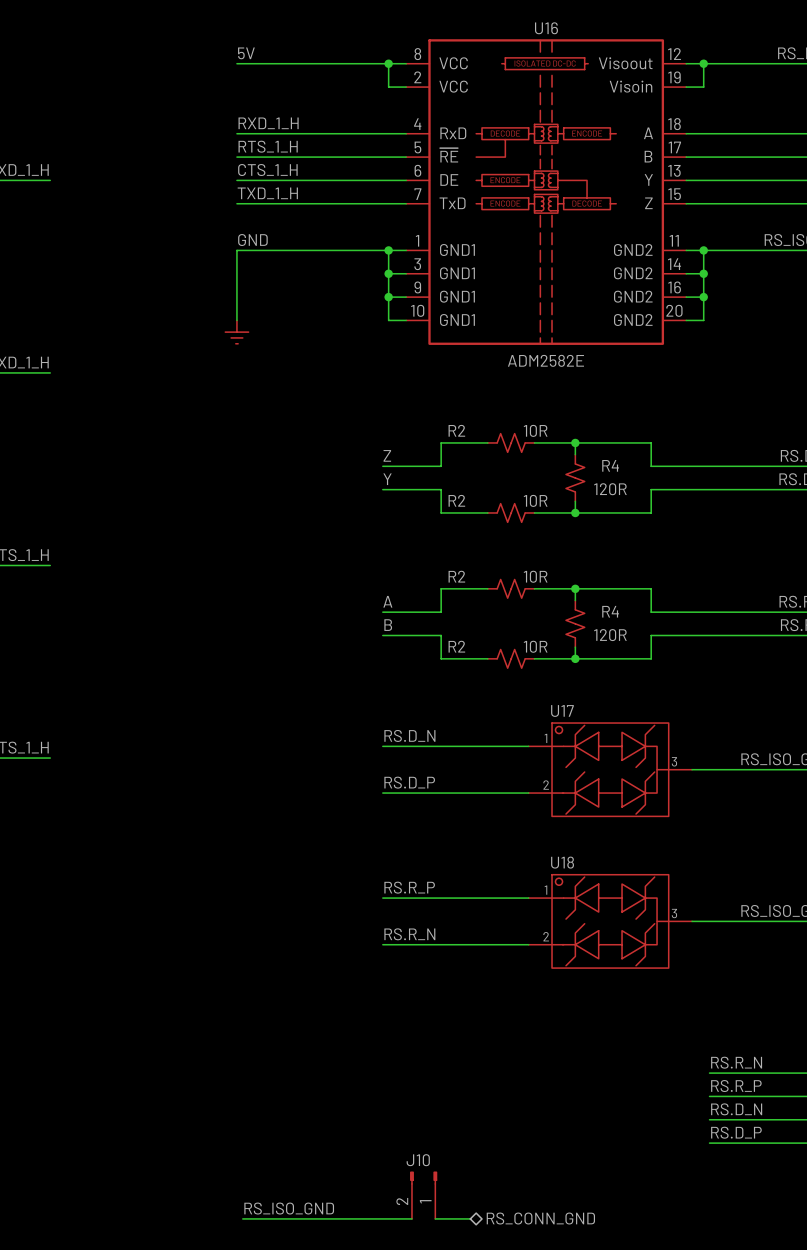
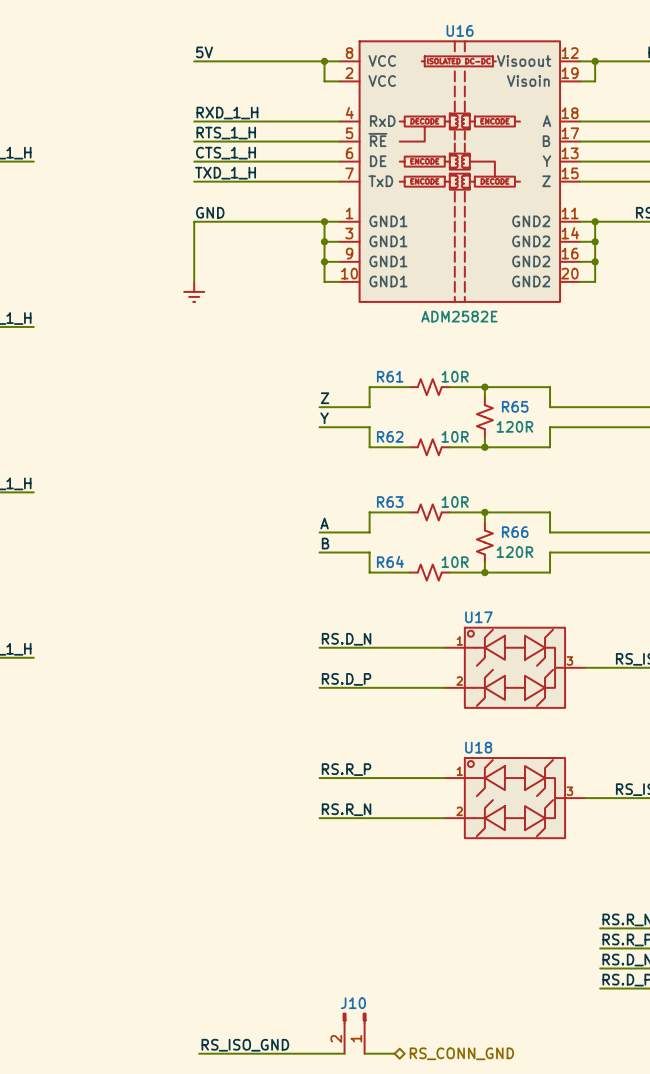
R2 name: R2 (456, 430) -> R61 (390, 376)
R4 name: R4 (610, 465) -> R65 (515, 406)
R2 name: R2 (456, 500) -> R62 (390, 436)
R2 name: R2 (456, 576) -> R63 (390, 502)
R4 name: R4 (610, 611) -> R66 (515, 532)
R2 name: R2 (456, 646) -> R64 (390, 561)

